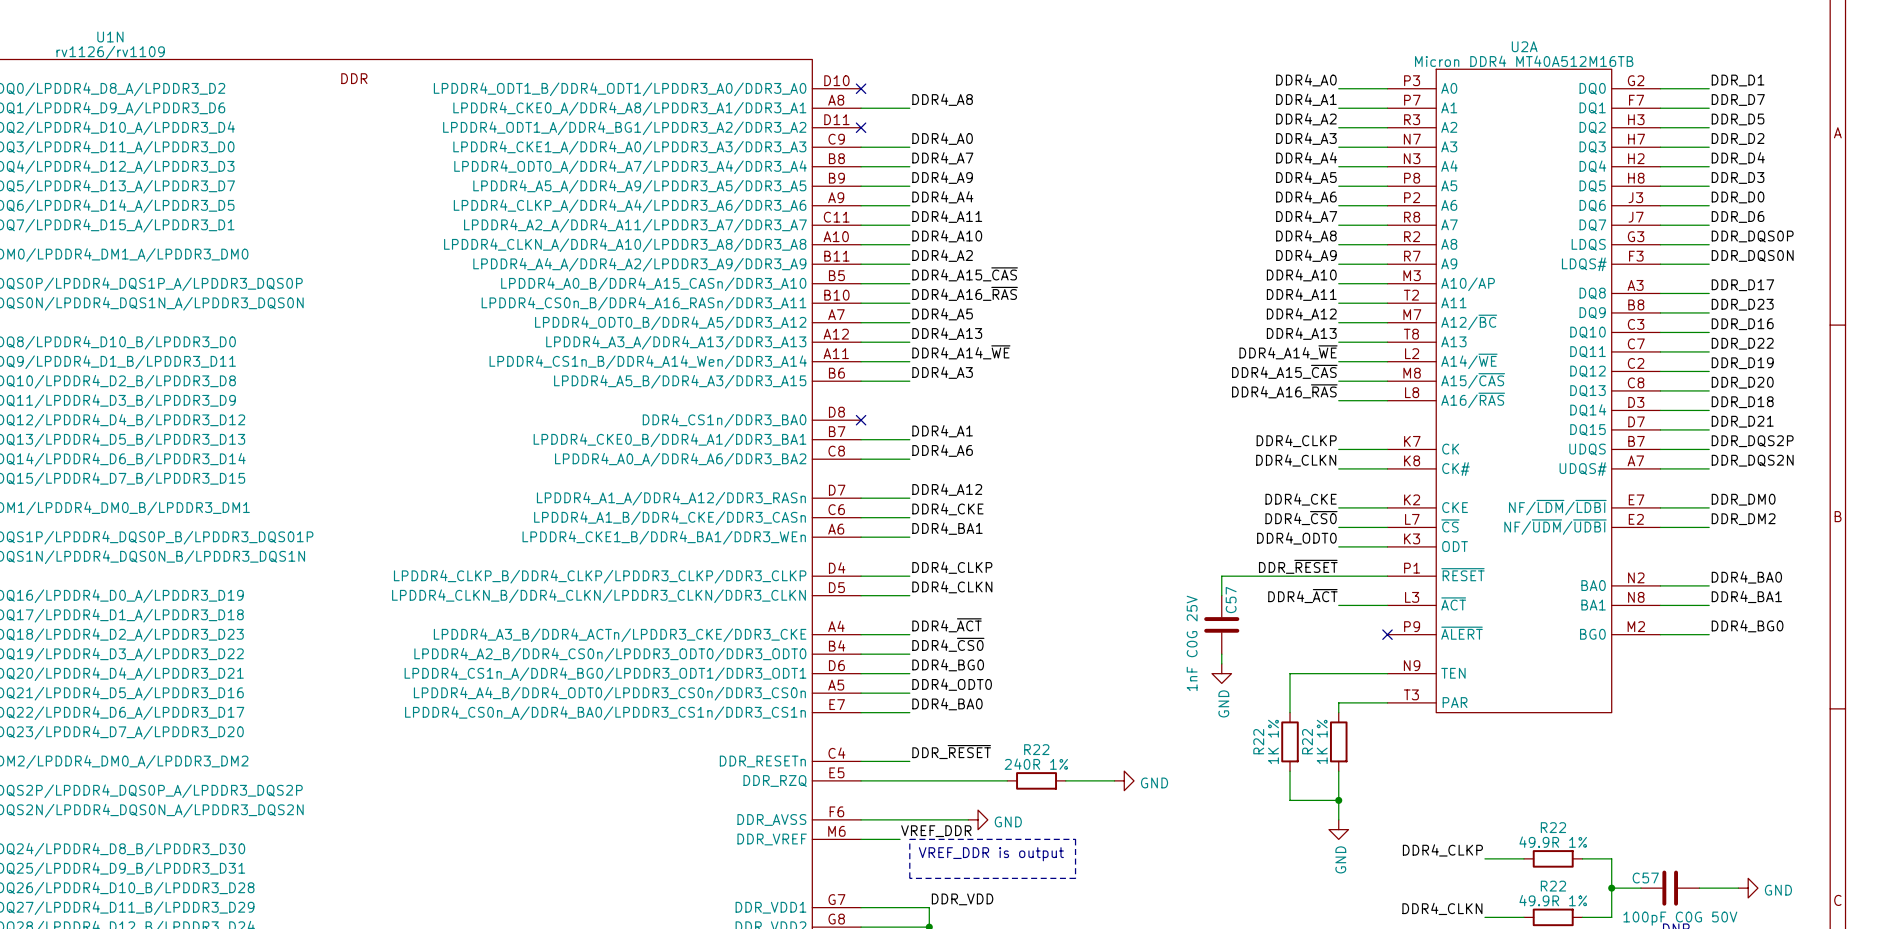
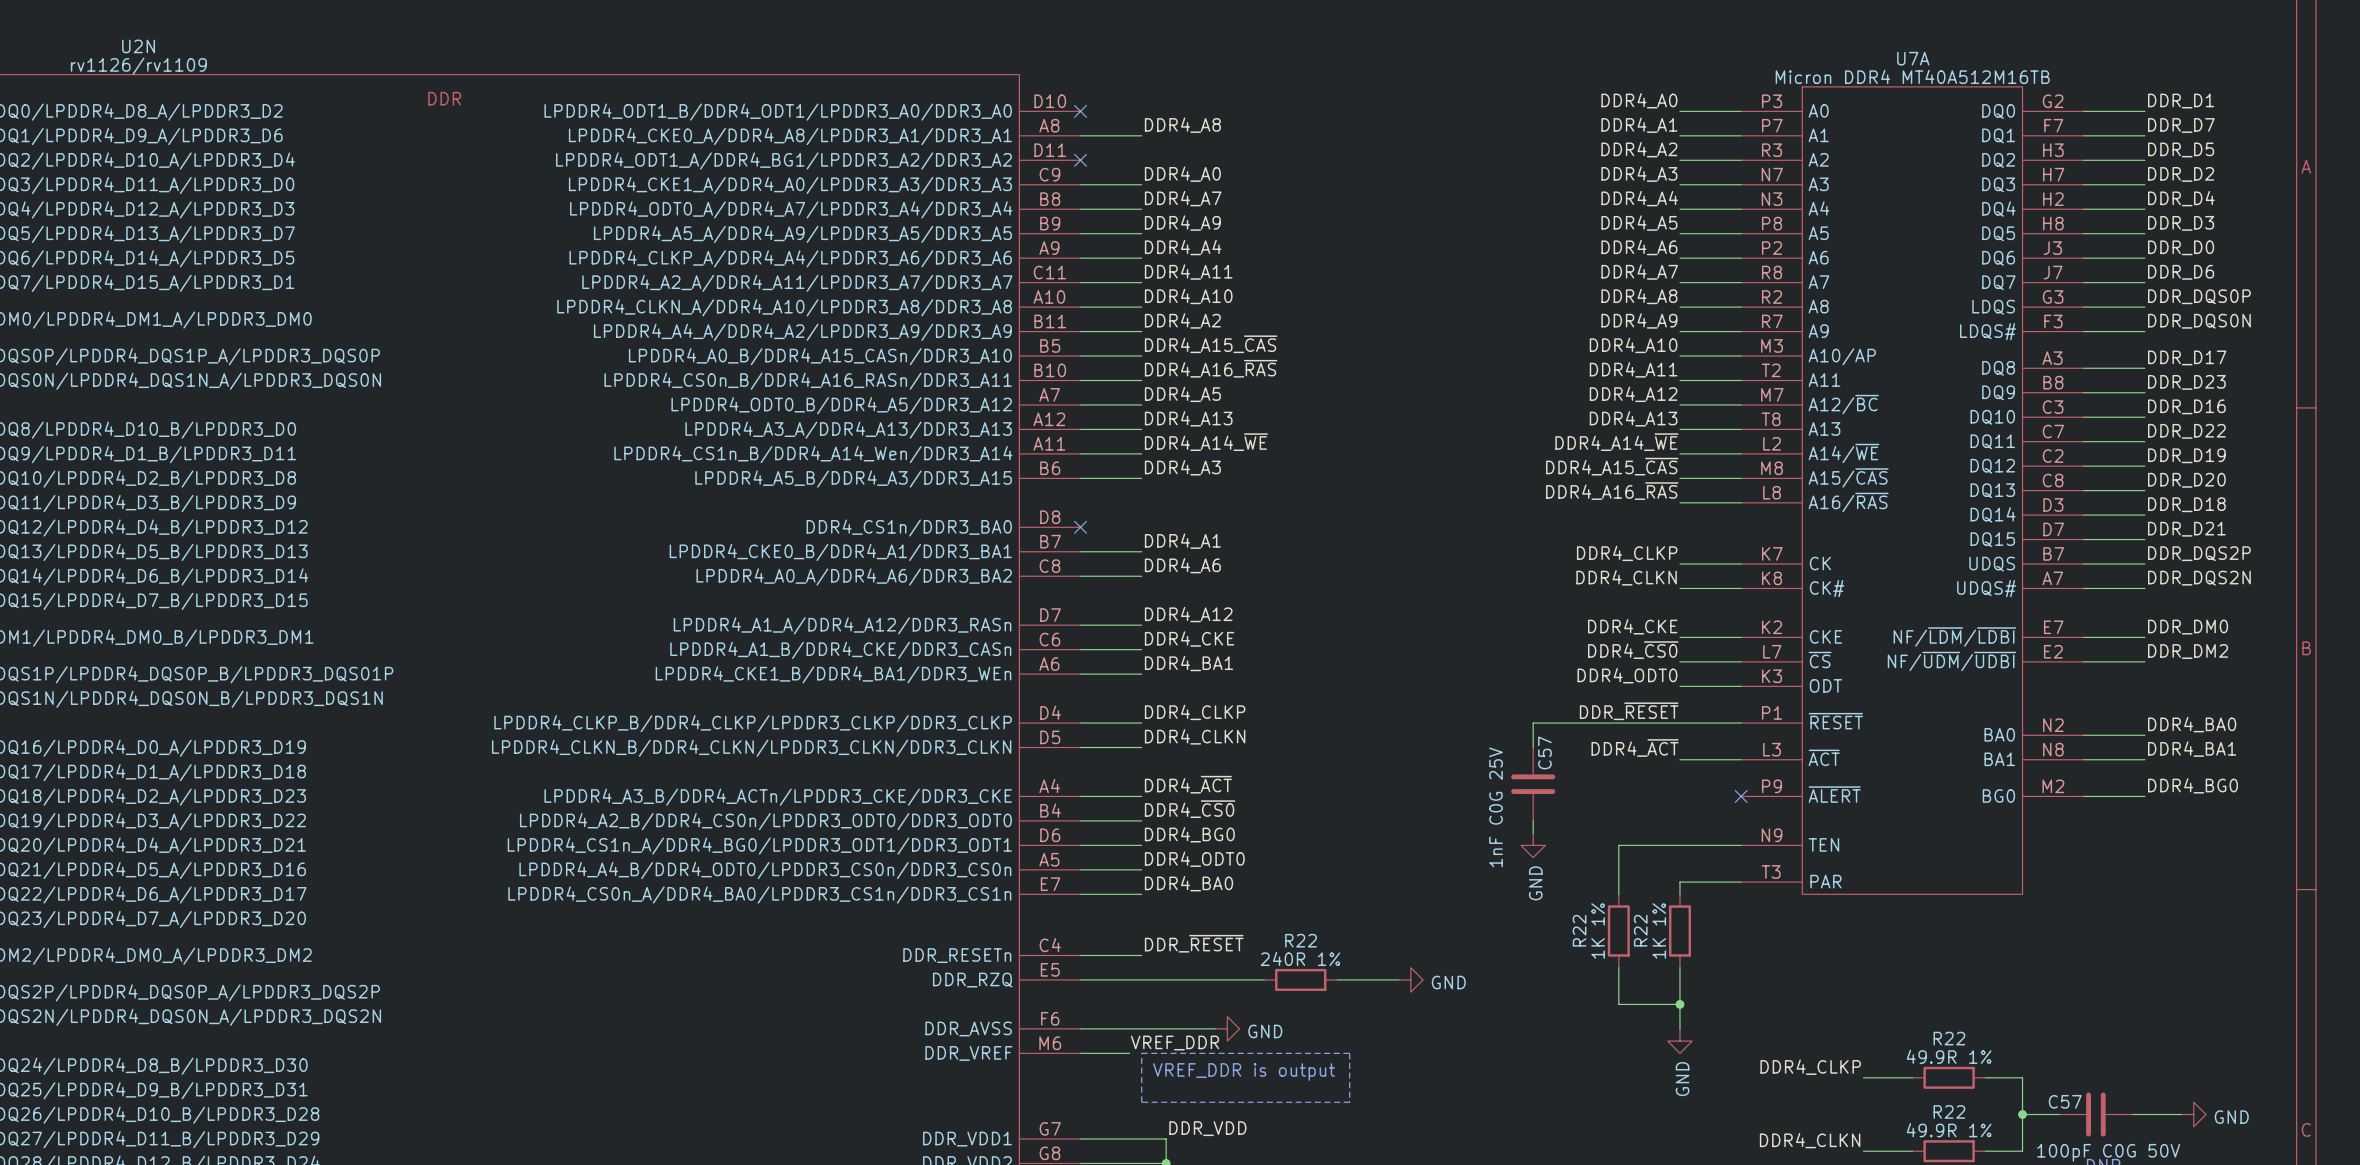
U1N name: U1N (110, 37) -> U2N (138, 46)
U2A name: U2A (1524, 46) -> U7A (1913, 58)

